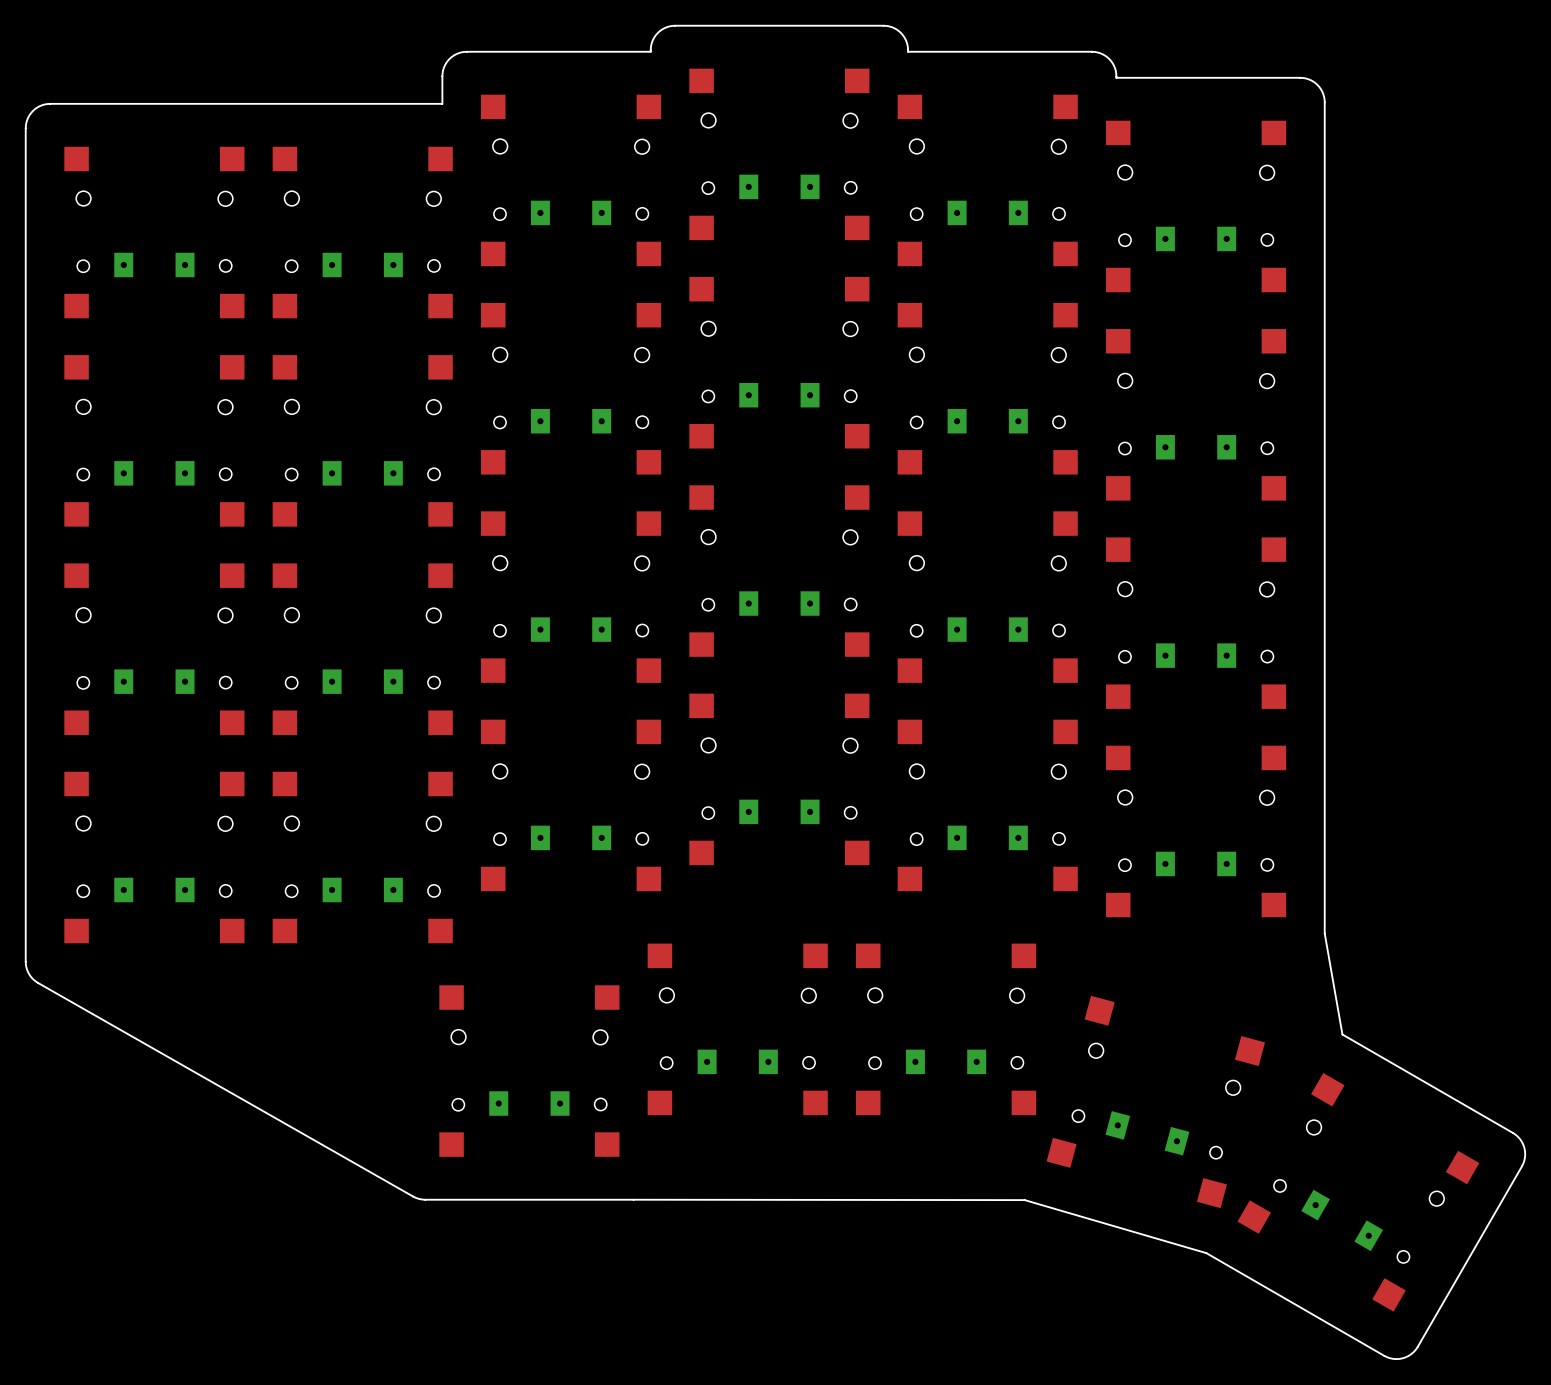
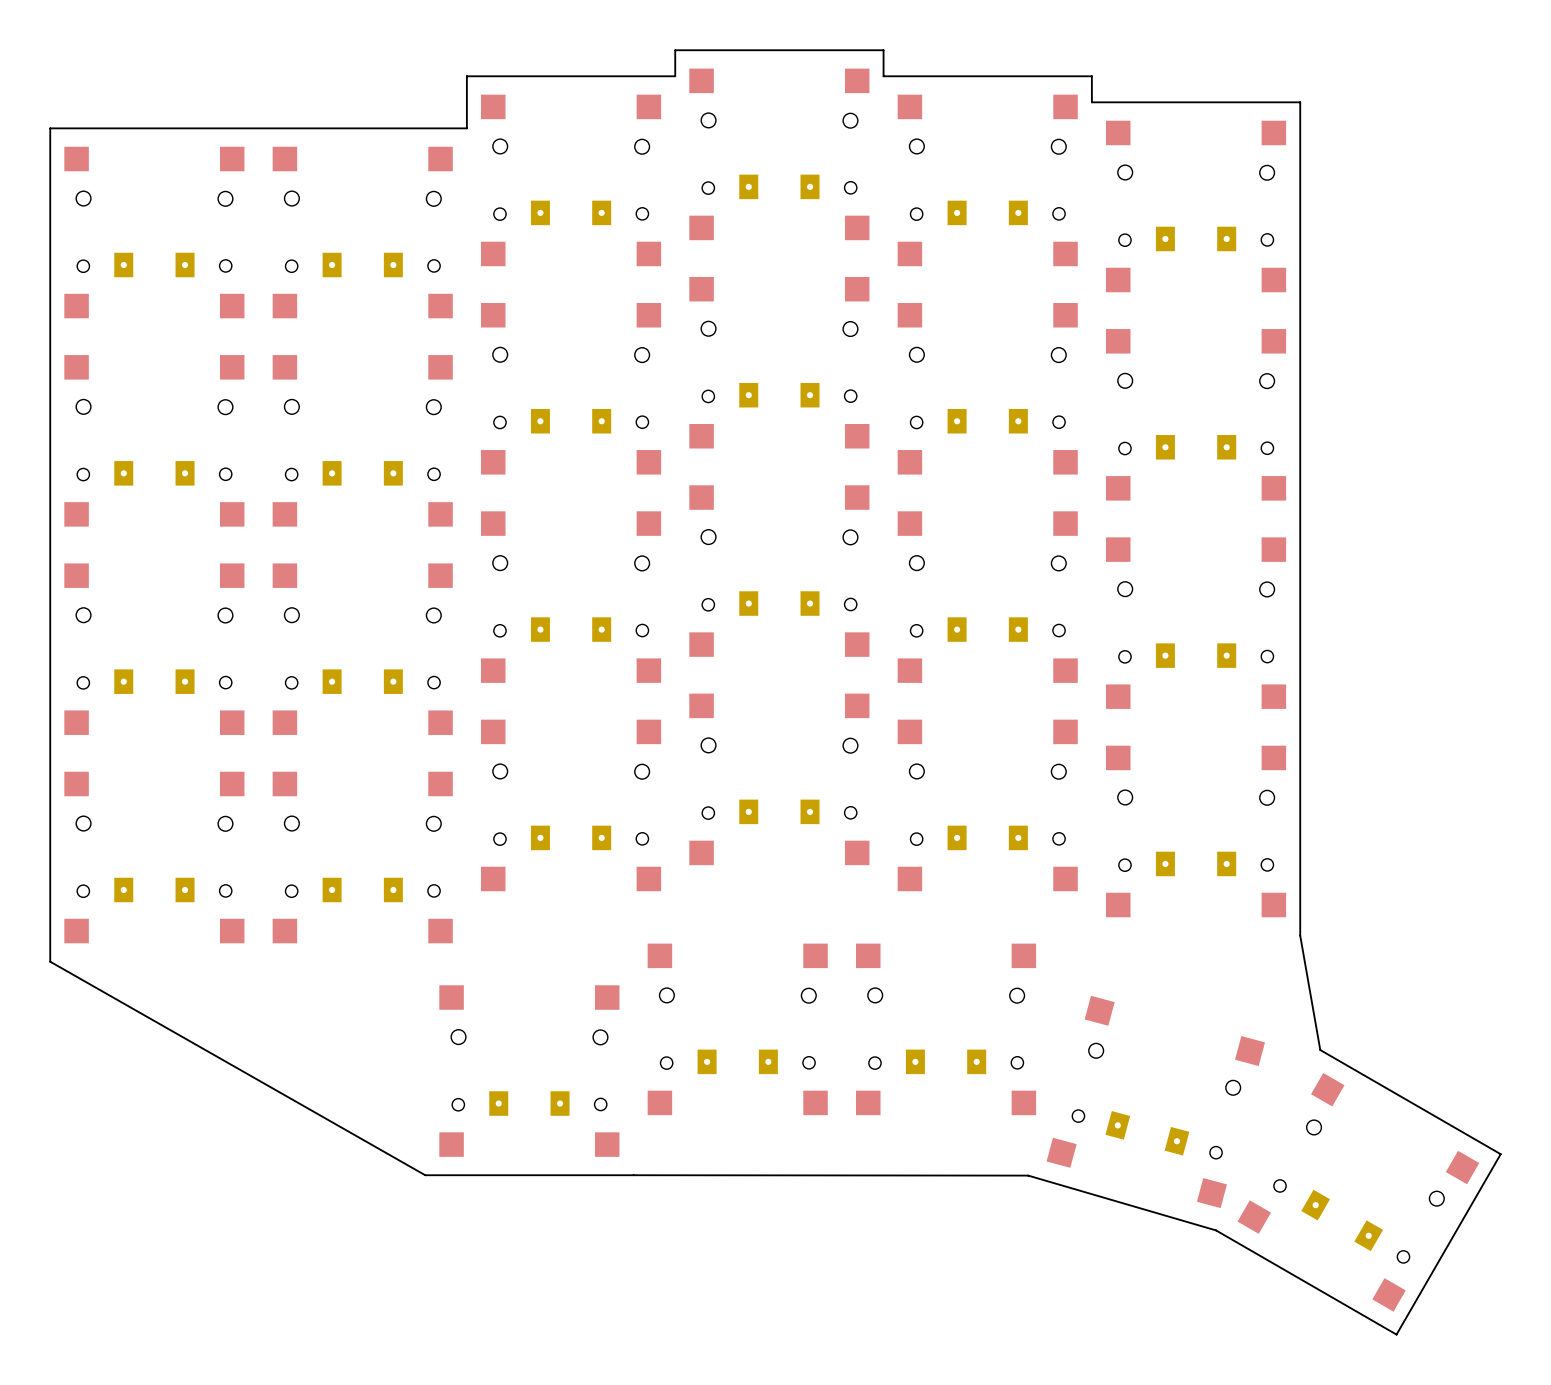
board edge: (675, 25) (886, 25) (896, 29) (902, 34) (906, 42) (908, 51) (1094, 51) (1104, 55) (1111, 60) (1115, 68) (1116, 77) (1302, 77) (1313, 81) (1322, 91) (1324, 102) (1324, 933) (1342, 1034) (1512, 1132) (1521, 1141) (1525, 1150) (1521, 1166) (1417, 1346) (1408, 1355) (1396, 1359) (1384, 1355) (1206, 1253) (1024, 1200) (418, 1198) (38, 982) (29, 974) (25, 961) (25, 128) (29, 115) (39, 106) (50, 103) (442, 103) (443, 68) (449, 58) (458, 53) (650, 51) (652, 42) (657, 32) (667, 27) (675, 25) -> (675, 50) (675, 76) (466, 76) (466, 128) (50, 128) (50, 961) (425, 1175) (1028, 1175) (1216, 1230) (1396, 1334) (1500, 1154) (1320, 1050) (1300, 935) (1300, 102) (1091, 102) (1091, 76) (883, 76) (883, 50) (675, 50)

